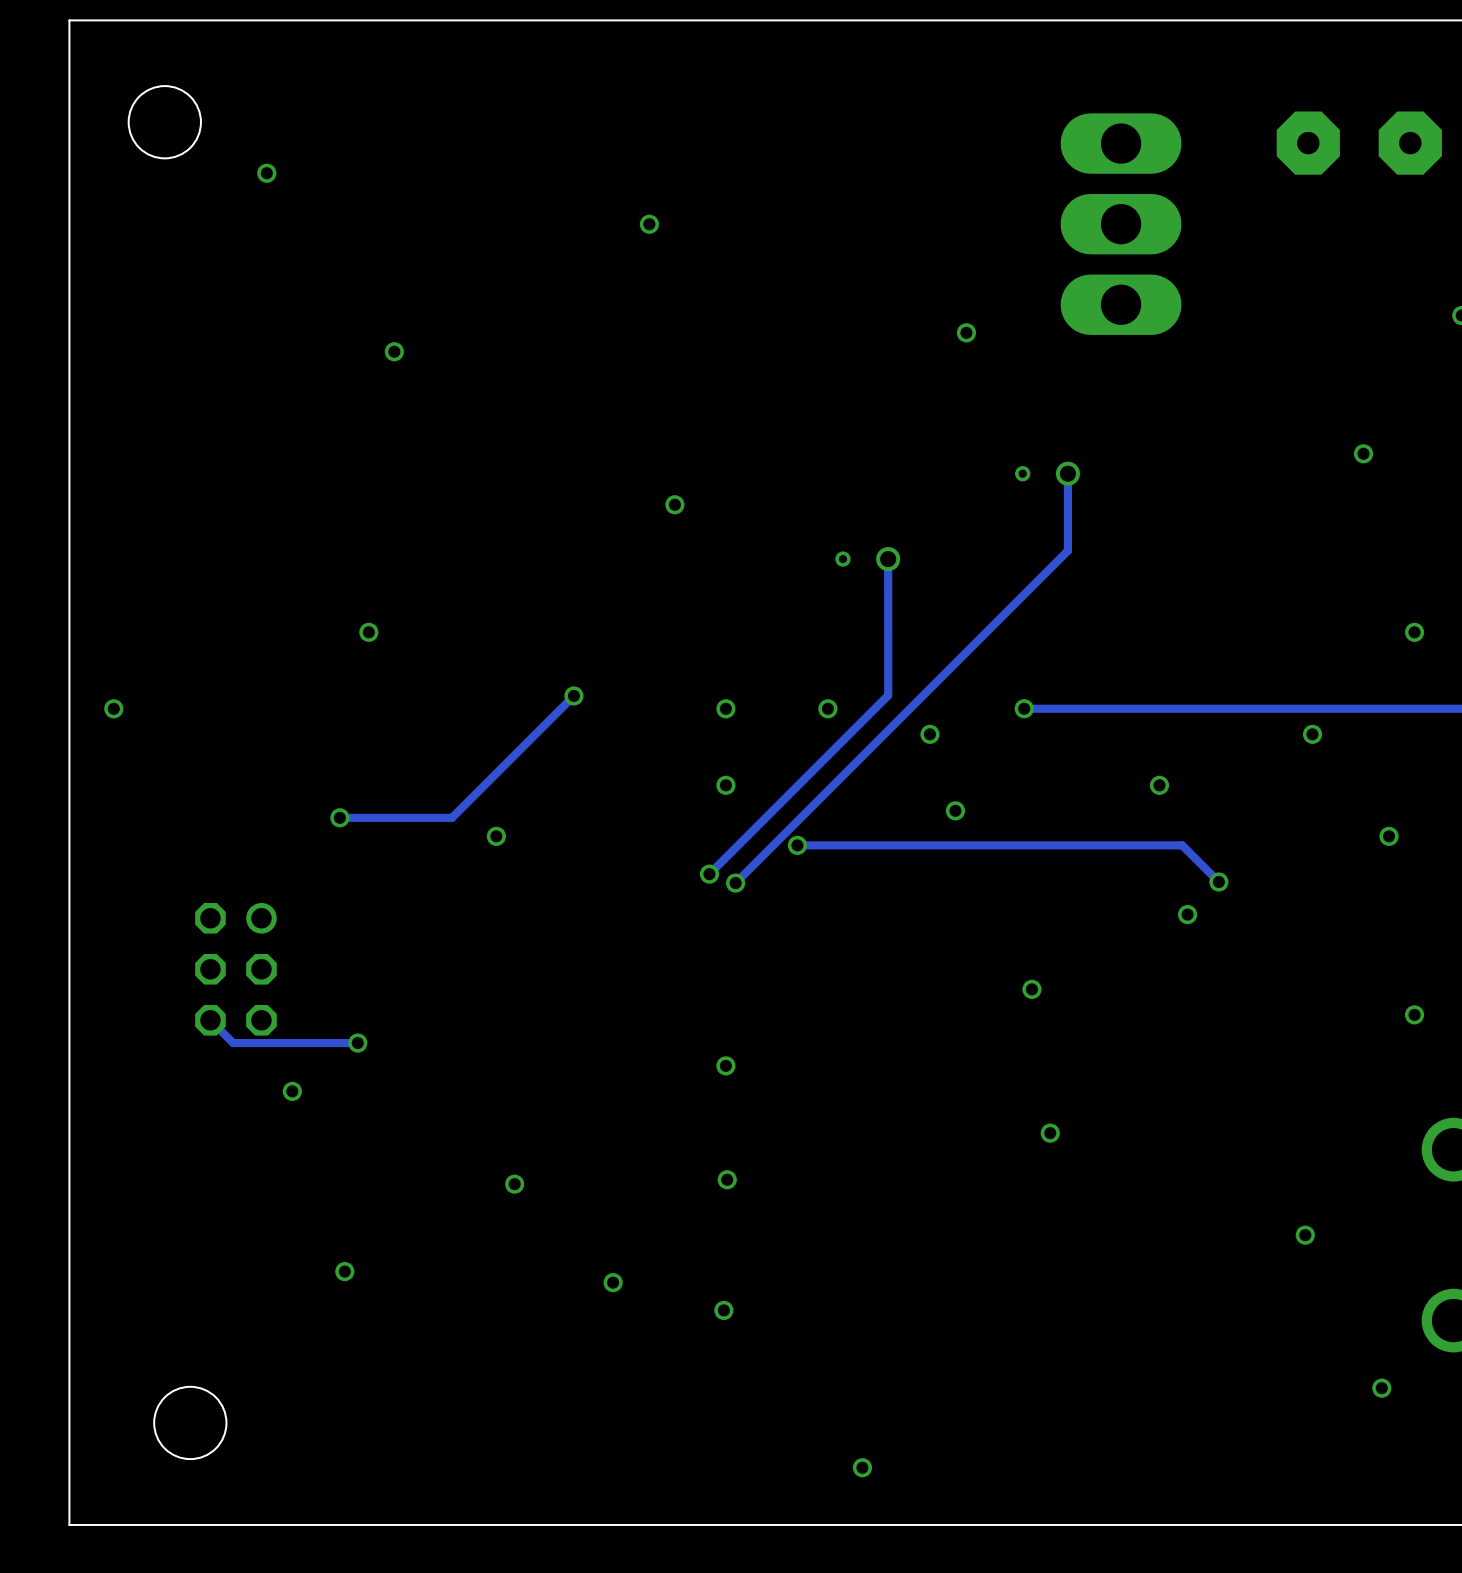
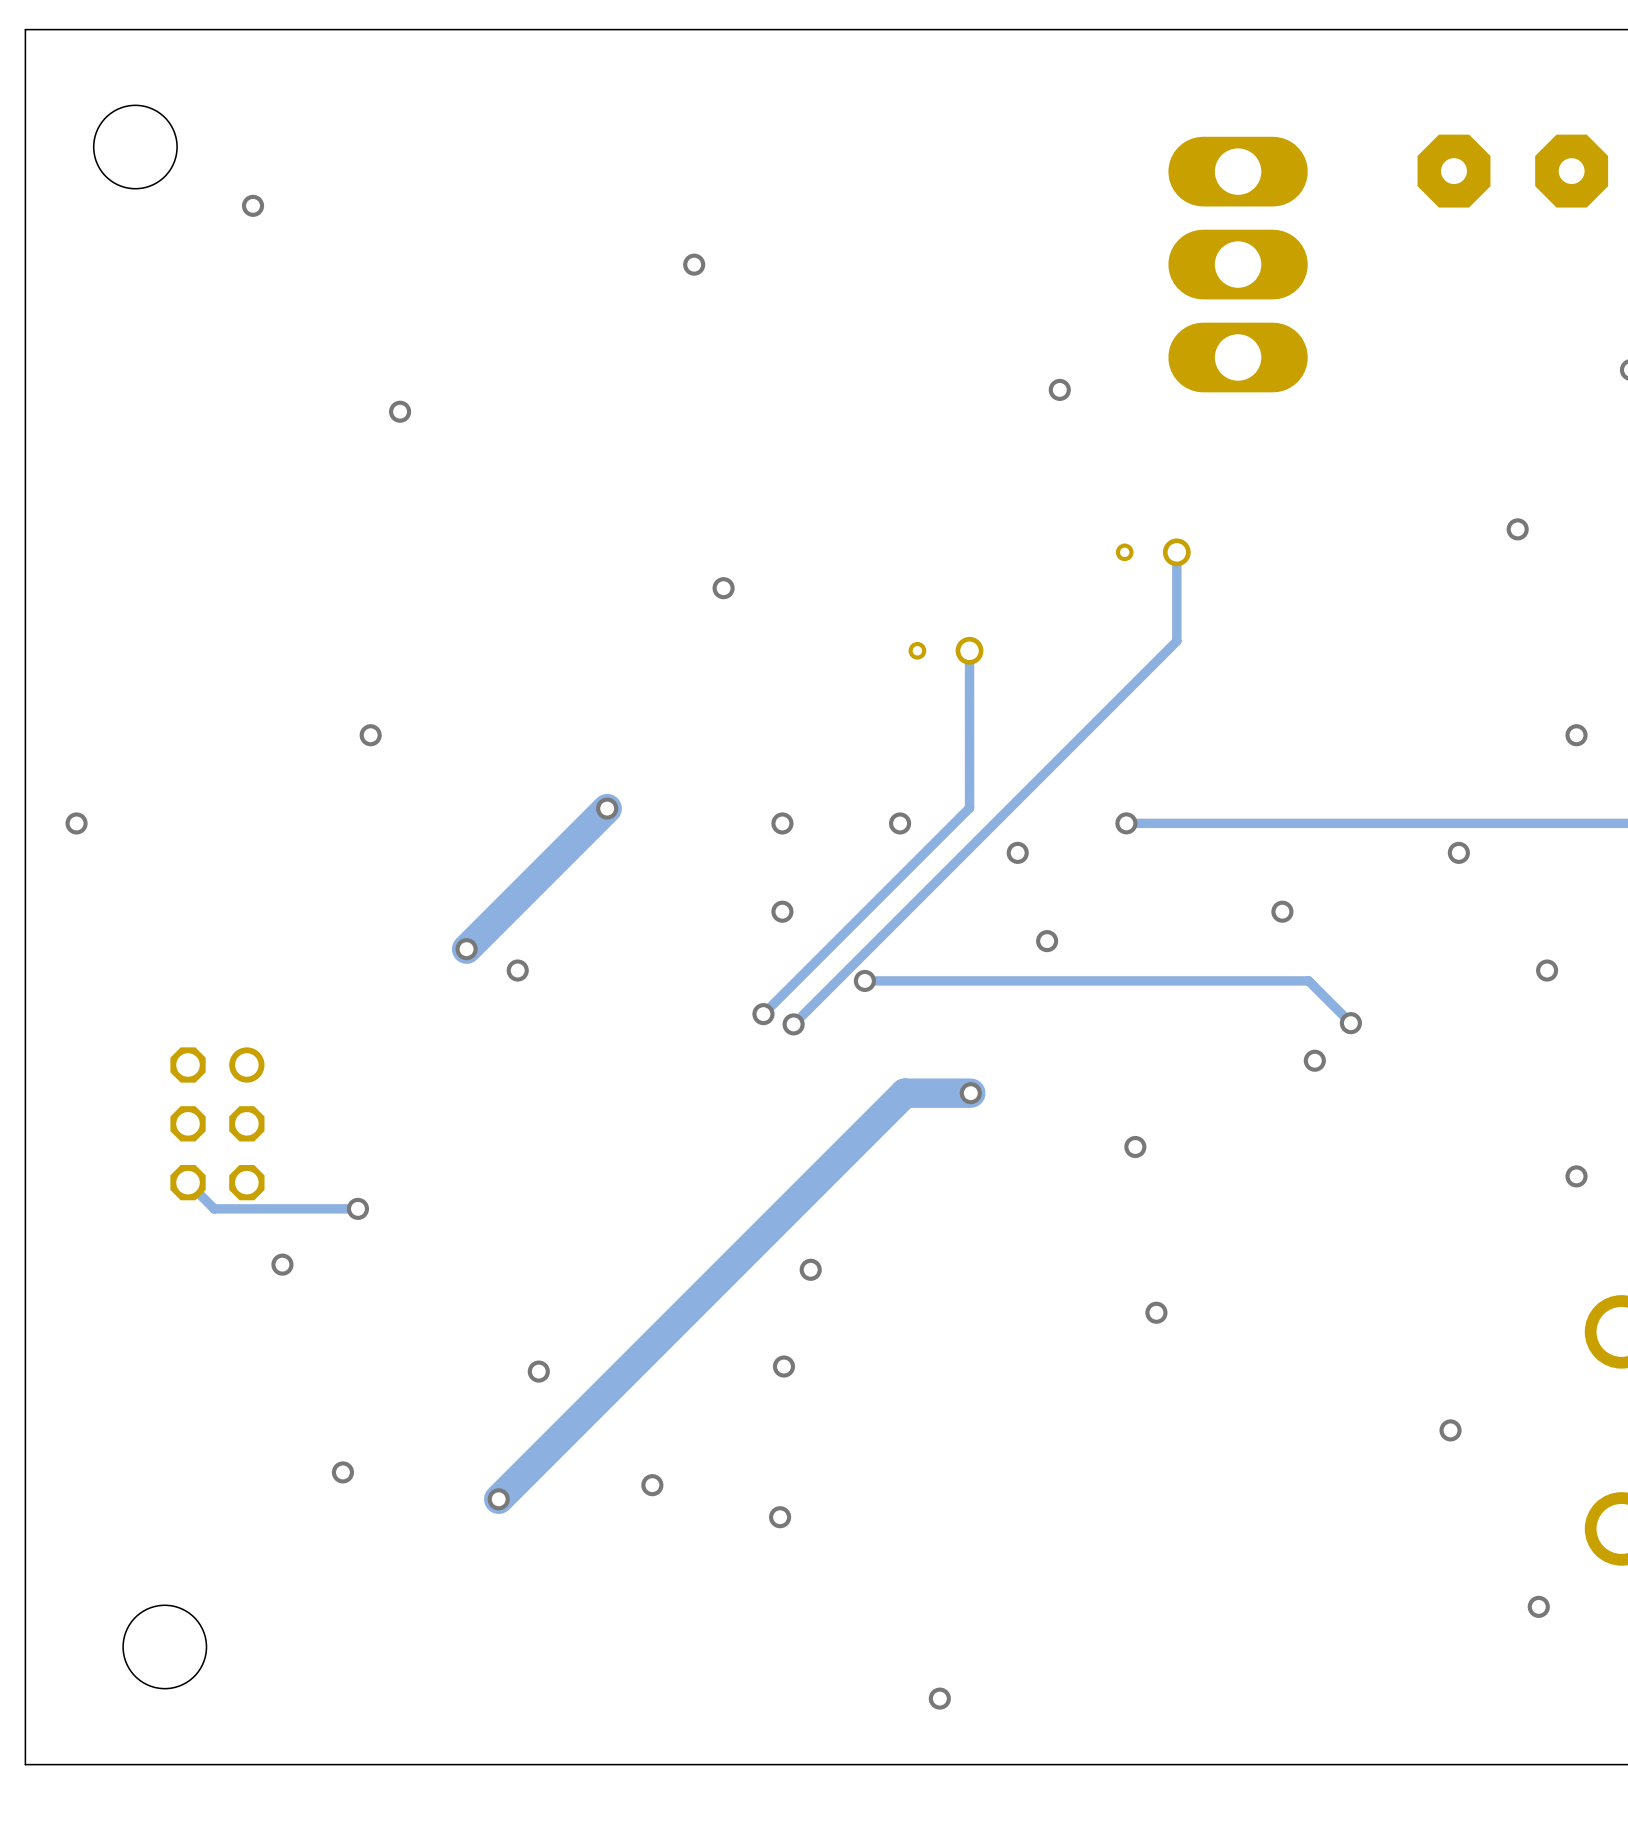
track width: thin (573, 695) (452, 817) -> thick (607, 808) (466, 949)
via position: (339, 817) -> (466, 949)
track: (452, 817) (339, 817) -> none
track: none -> (970, 1093) (904, 1093) (498, 1499)
via: none -> (970, 1093)
via position: (725, 1065) -> (810, 1269)
via: none -> (498, 1499)

